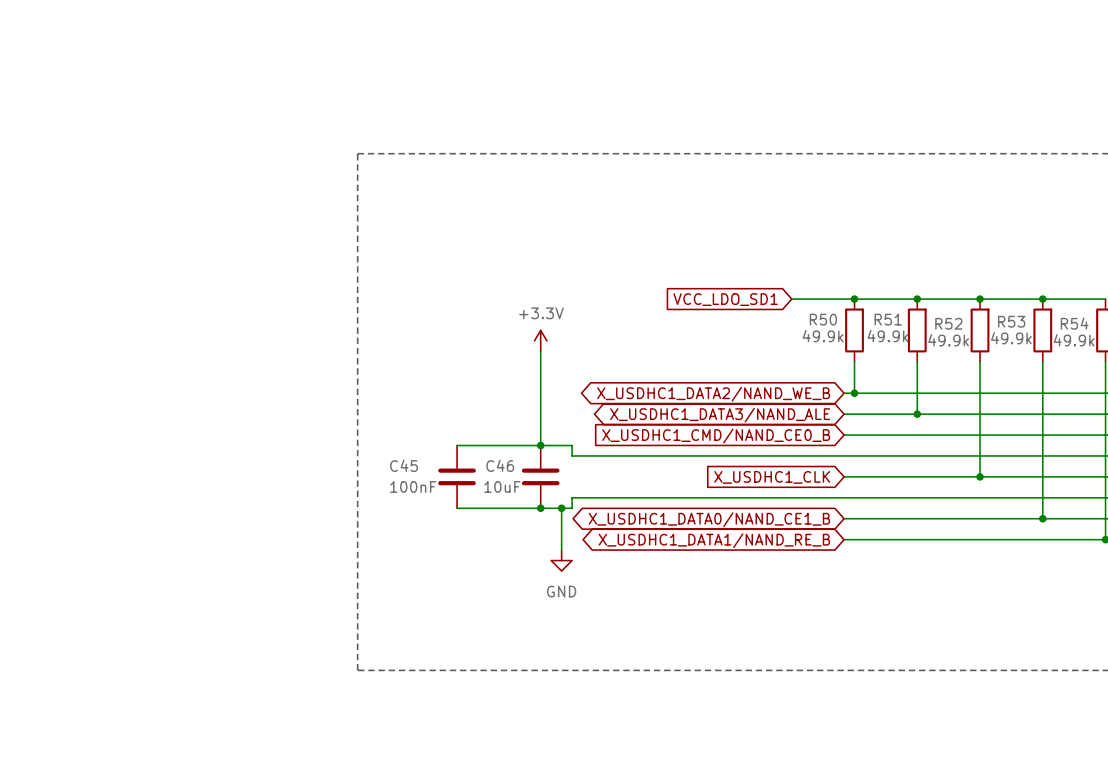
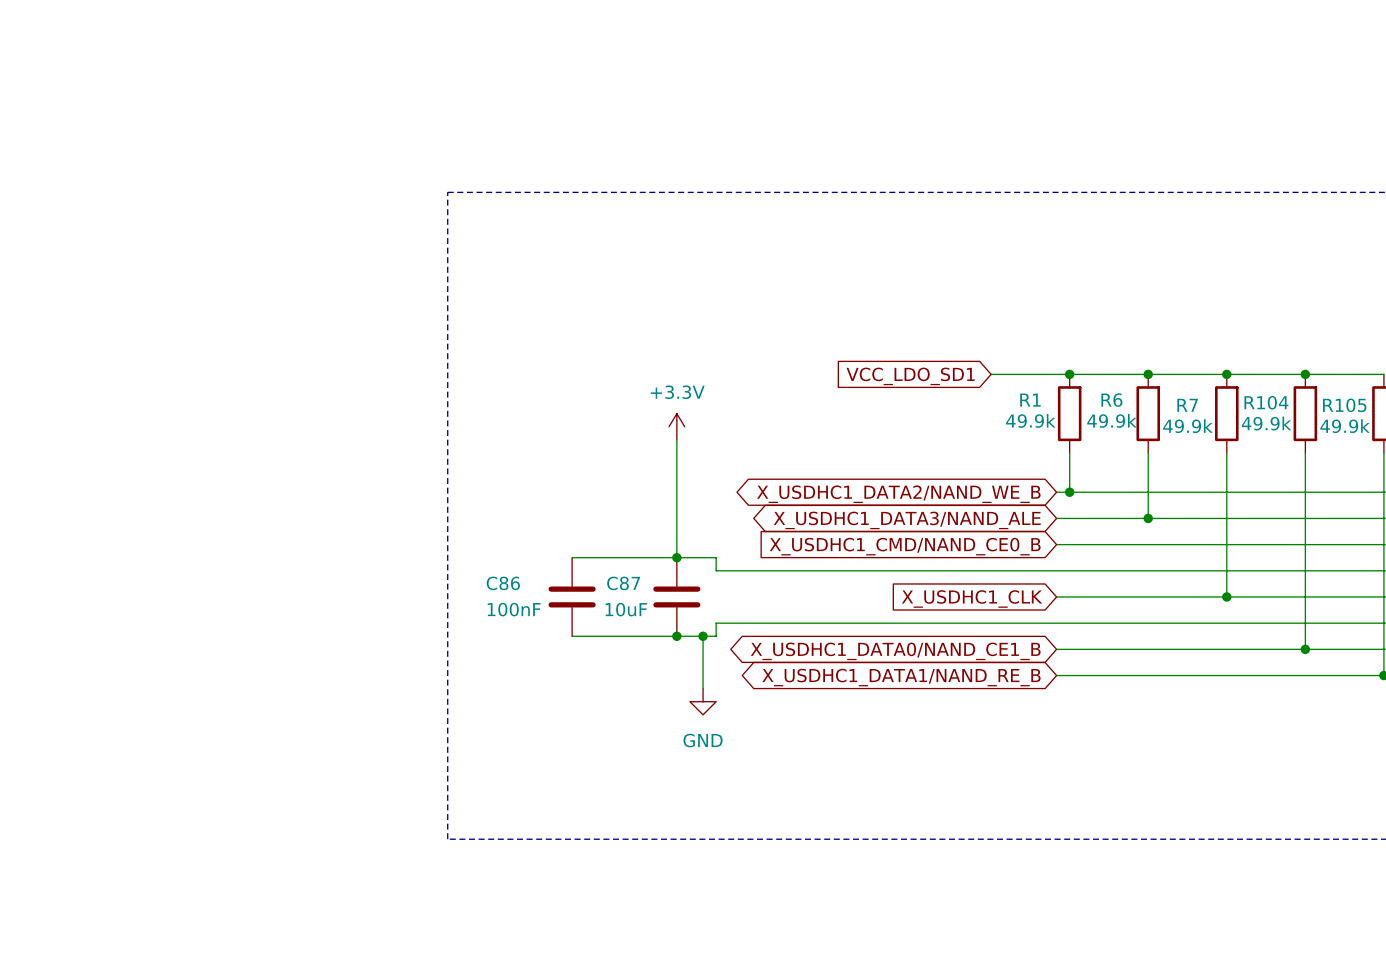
R50 name: R50 (823, 319) -> R1 (1030, 400)
R51 name: R51 (888, 319) -> R6 (1111, 400)
R53 name: R53 (1011, 321) -> R104 (1266, 402)
R52 name: R52 (948, 323) -> R7 (1187, 405)
R54 name: R54 (1074, 323) -> R105 (1344, 405)
C45 name: C45 (404, 465) -> C86 (503, 583)
C46 name: C46 (500, 465) -> C87 (623, 583)

